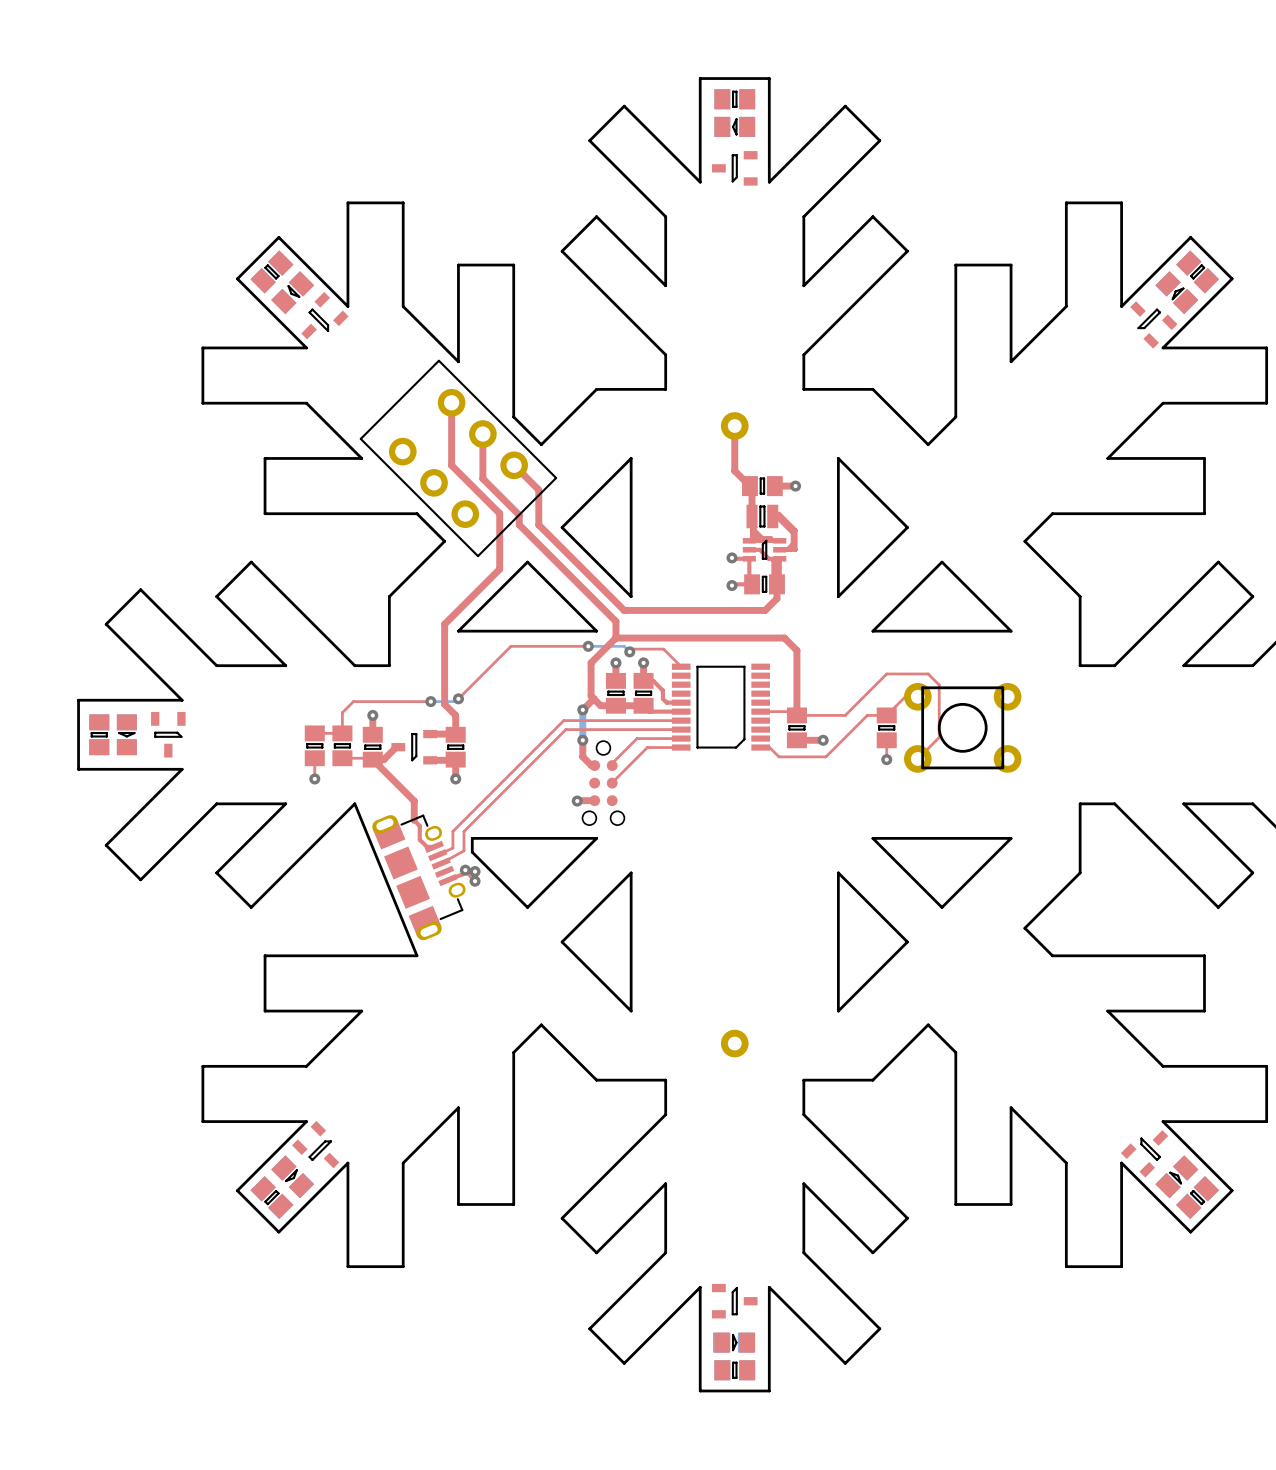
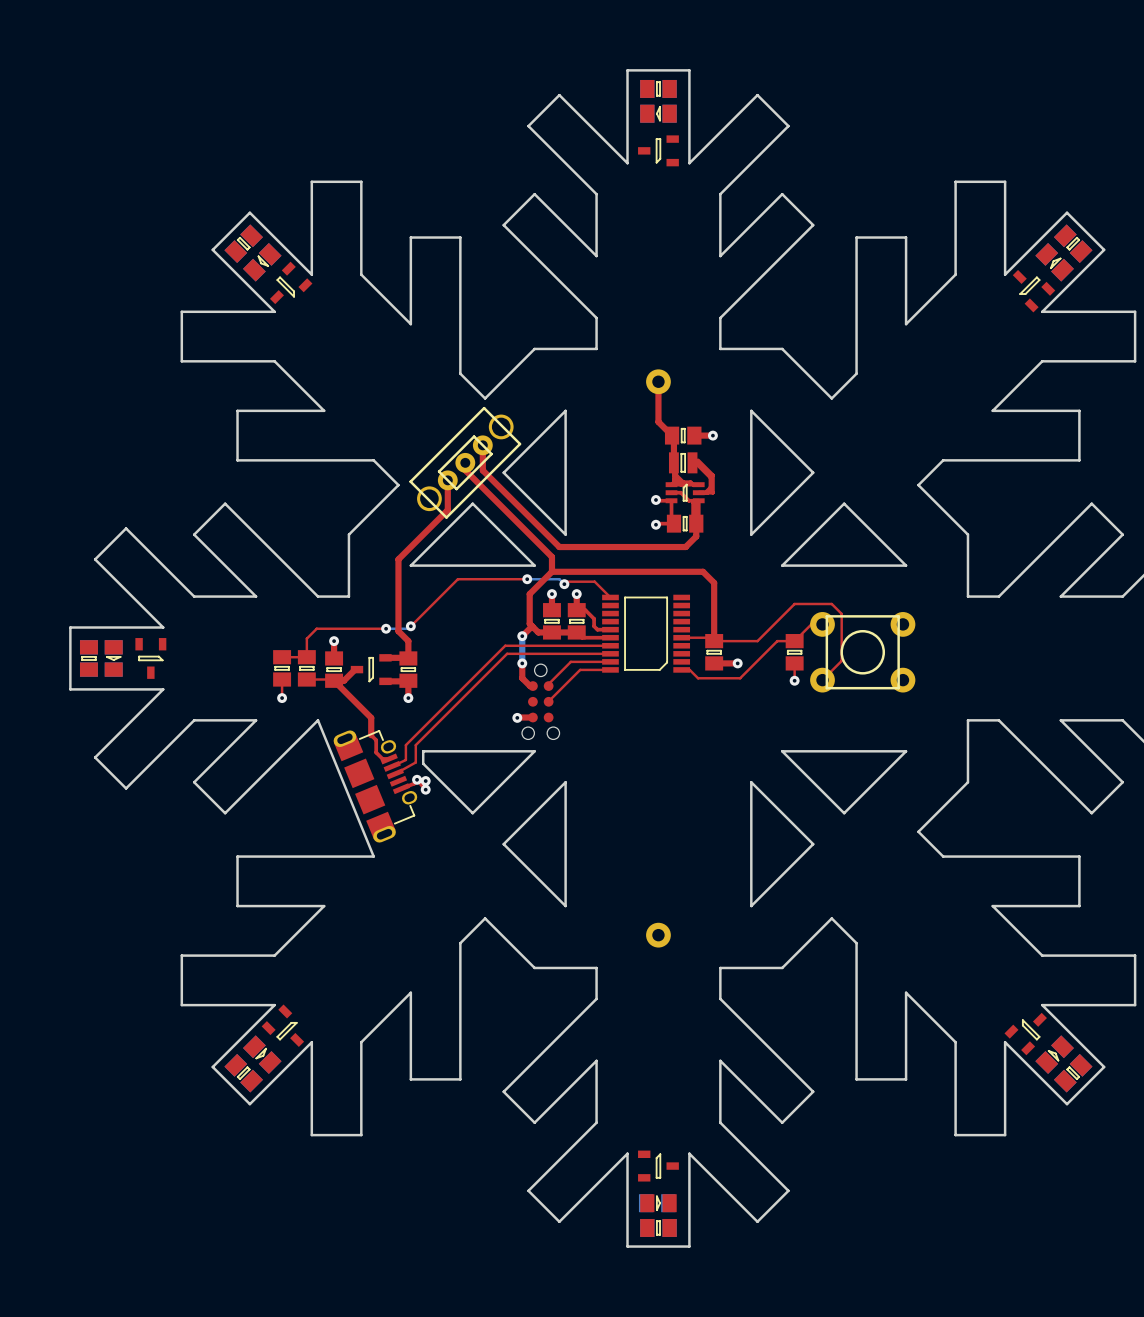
top track: (451, 402) (451, 465) (499, 513) (499, 536) -> none
top track: (482, 434) (482, 478) (519, 516) -> none
part: (458, 458) -> none
top track: (514, 465) (538, 489) (538, 496) -> none
part: none -> (465, 462)

